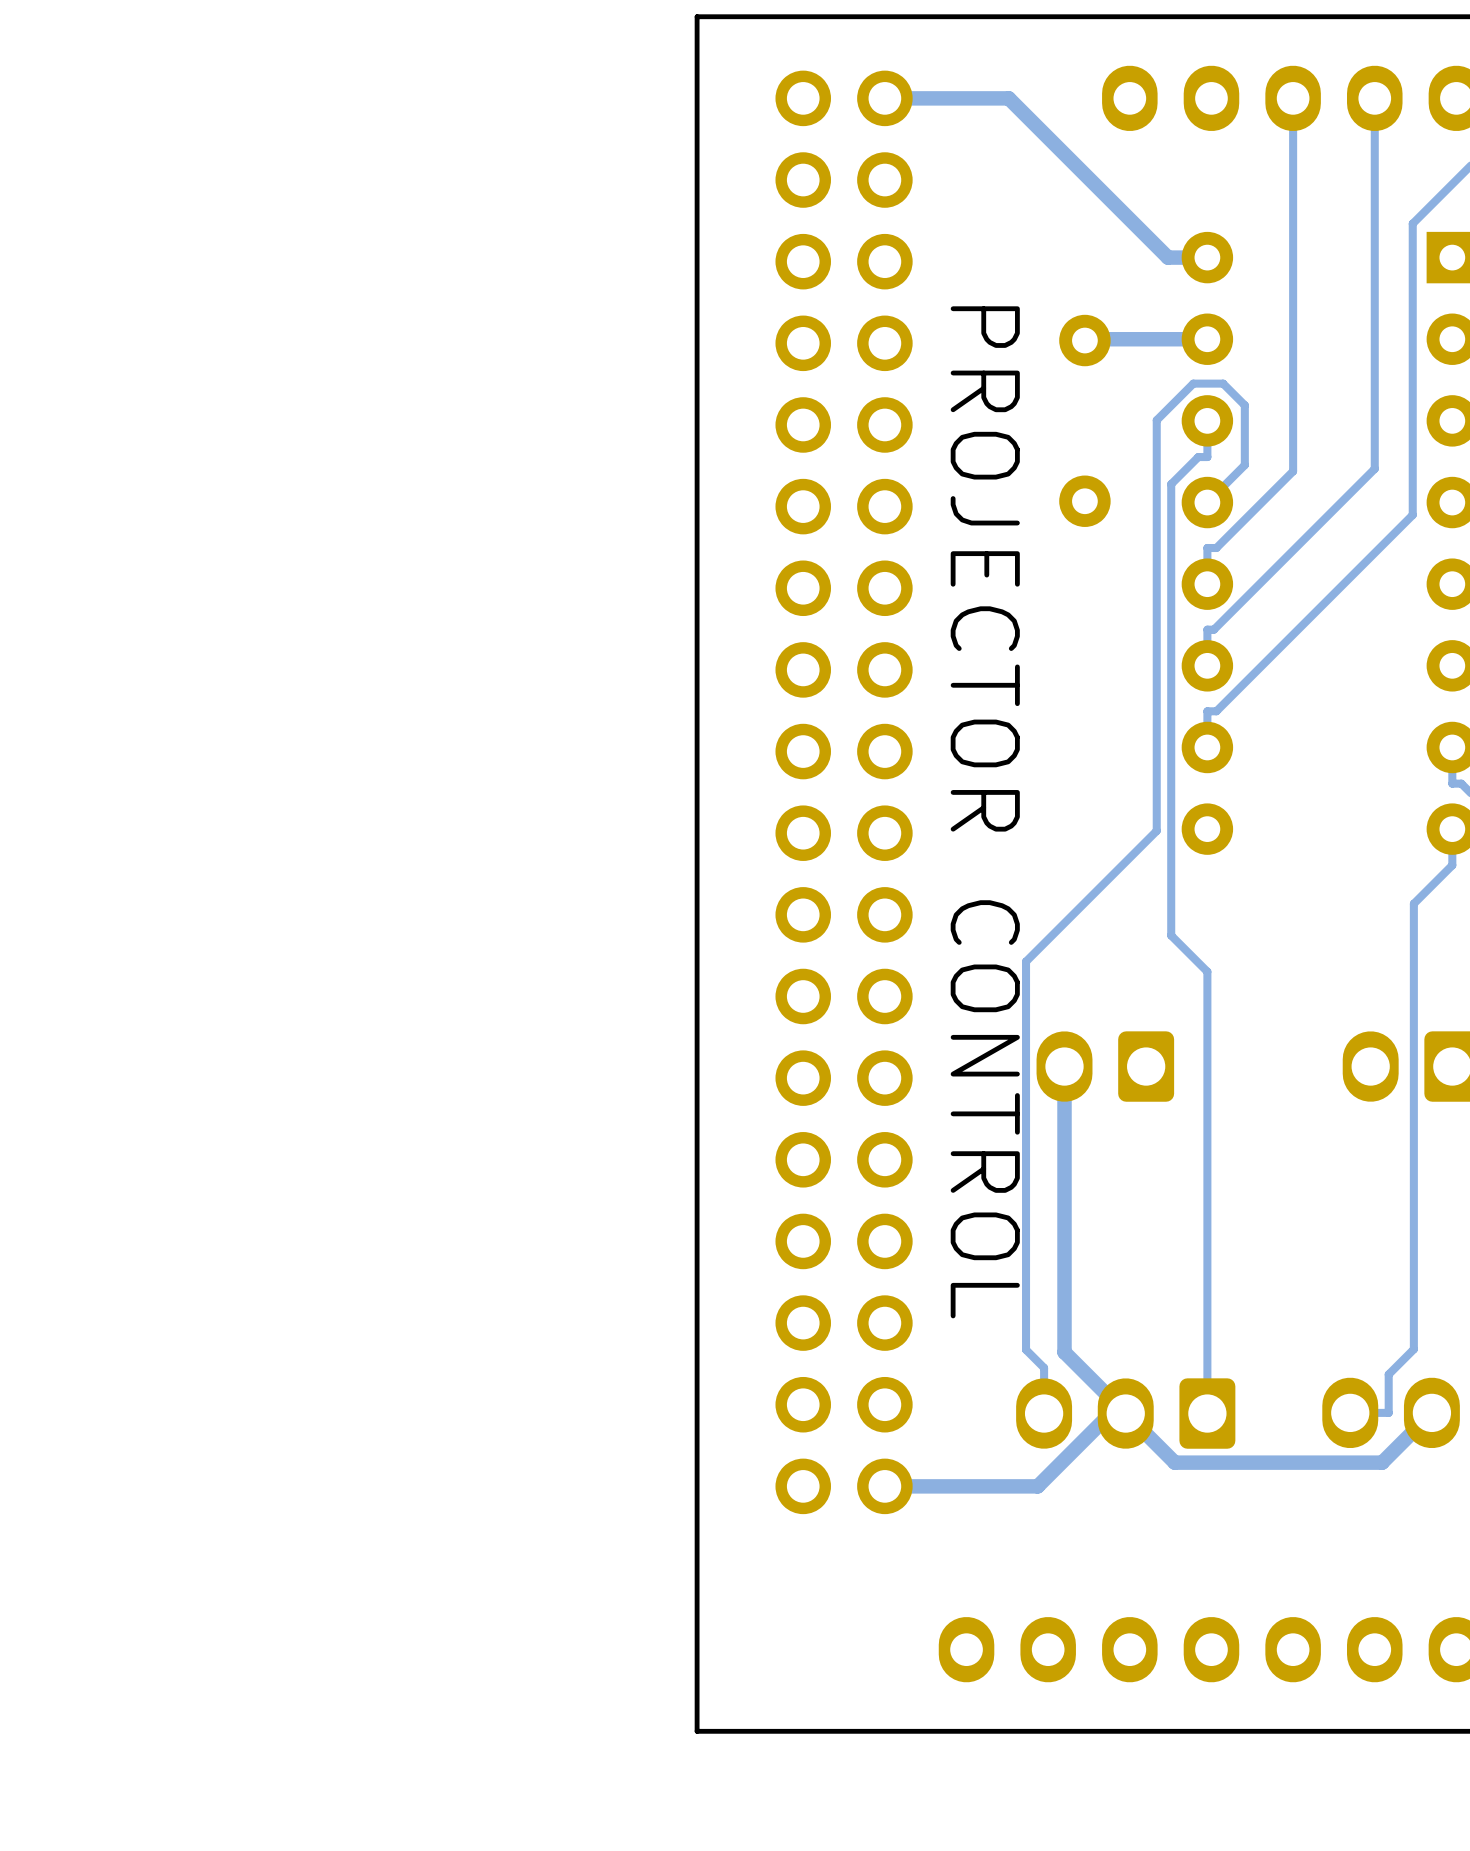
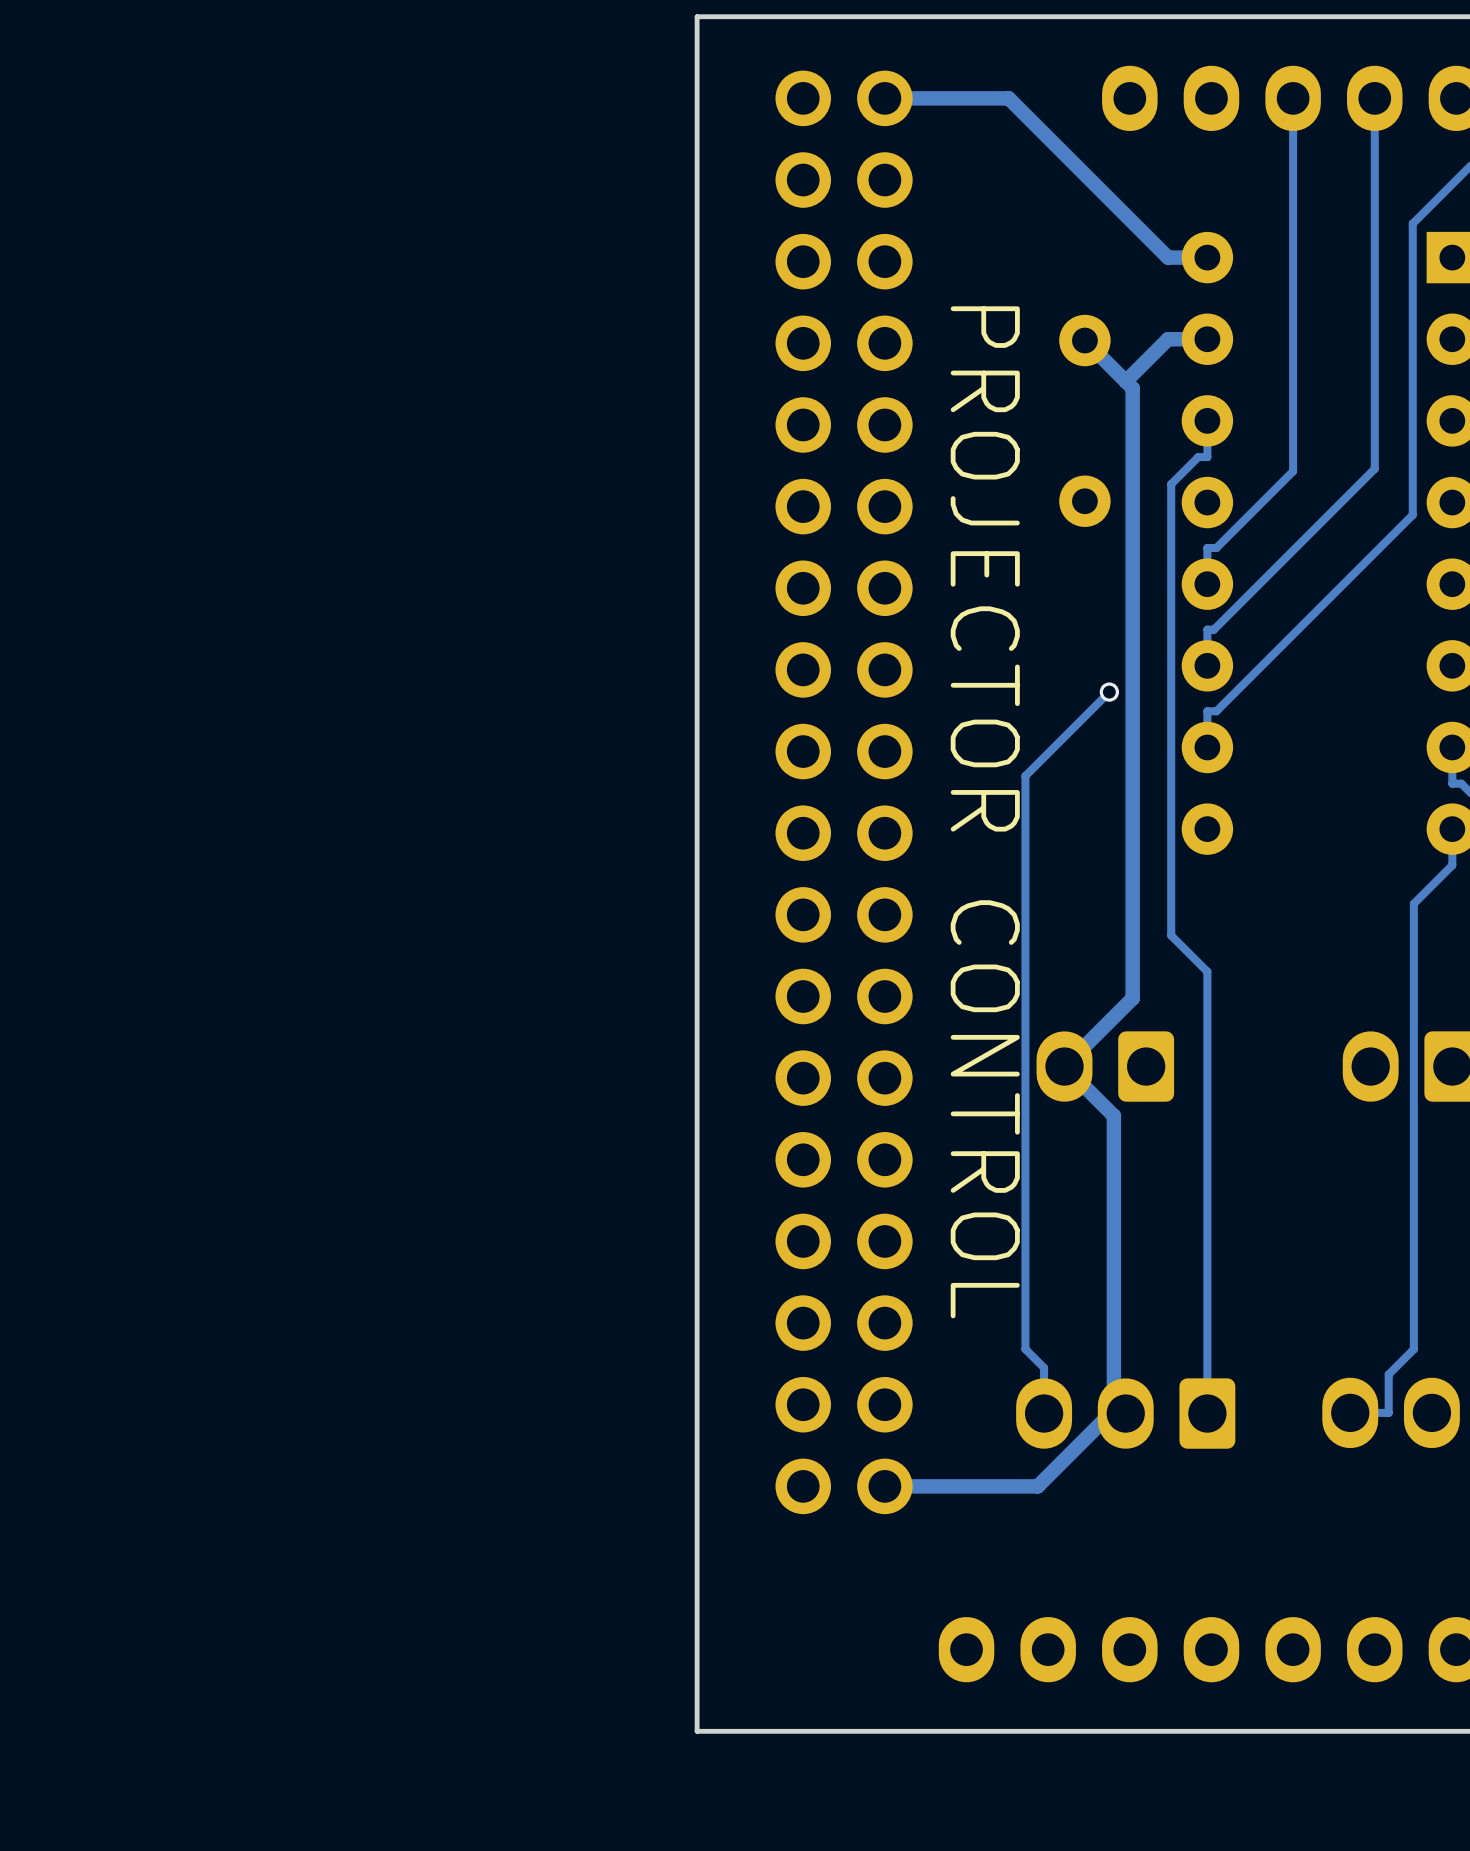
track: (1168, 339) (1084, 340) -> (1168, 339) (1125, 381)
track: none -> (1084, 340) (1132, 388) (1132, 998) (1064, 1066) (1113, 1115) (1113, 1413)
track: (1207, 502) (1244, 465) (1244, 405) (1223, 383) (1193, 383) (1156, 420) (1156, 830) (1026, 961) (1026, 1349) -> (1109, 692) (1025, 776) (1026, 1349)
via: none -> (1109, 692)
track: (1064, 1066) (1064, 1352) (1174, 1462) (1382, 1462) (1431, 1412) -> none

